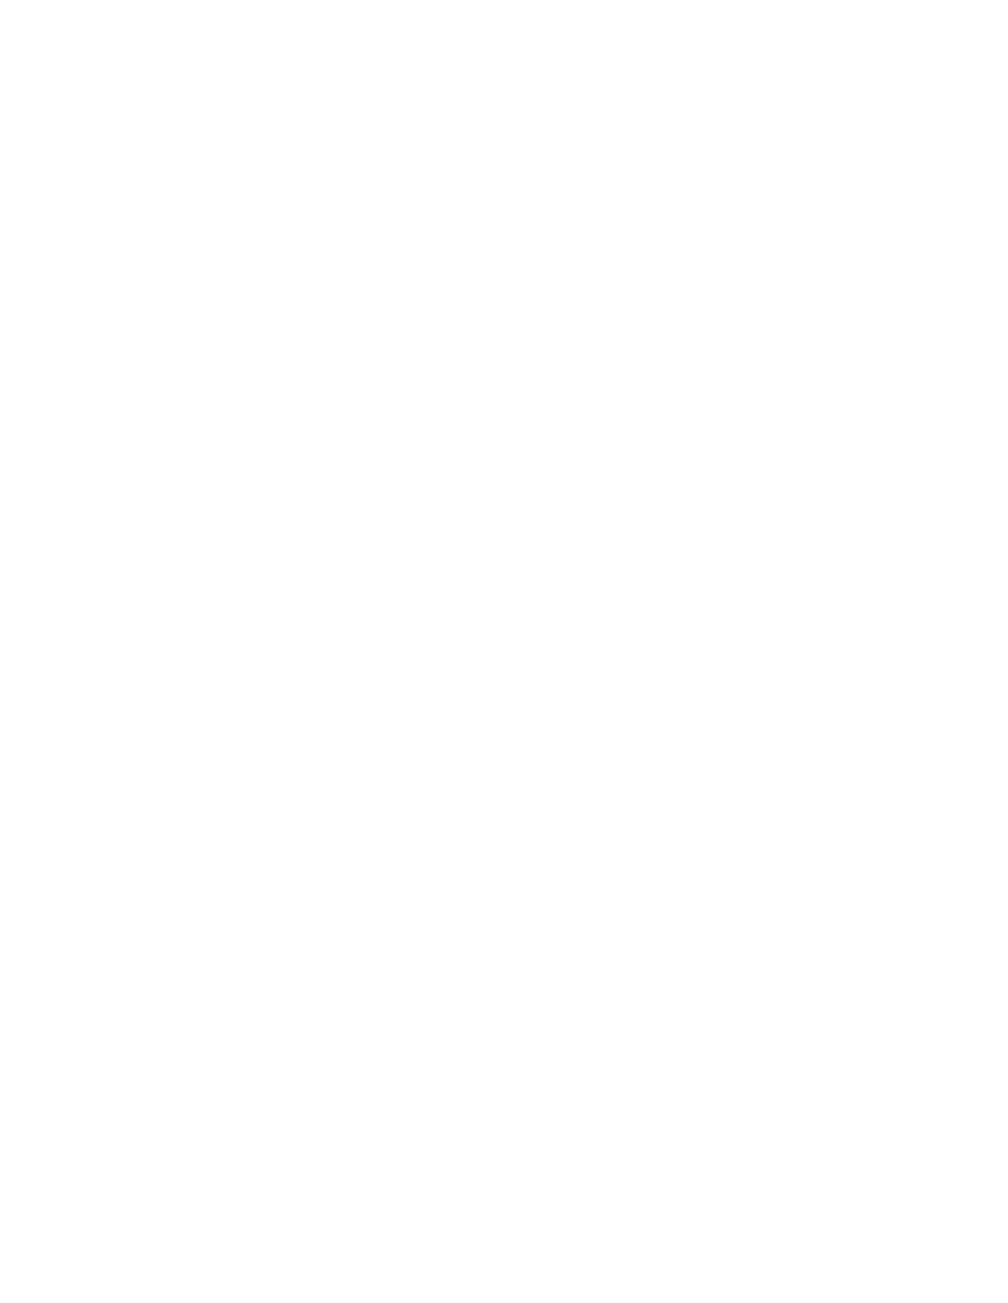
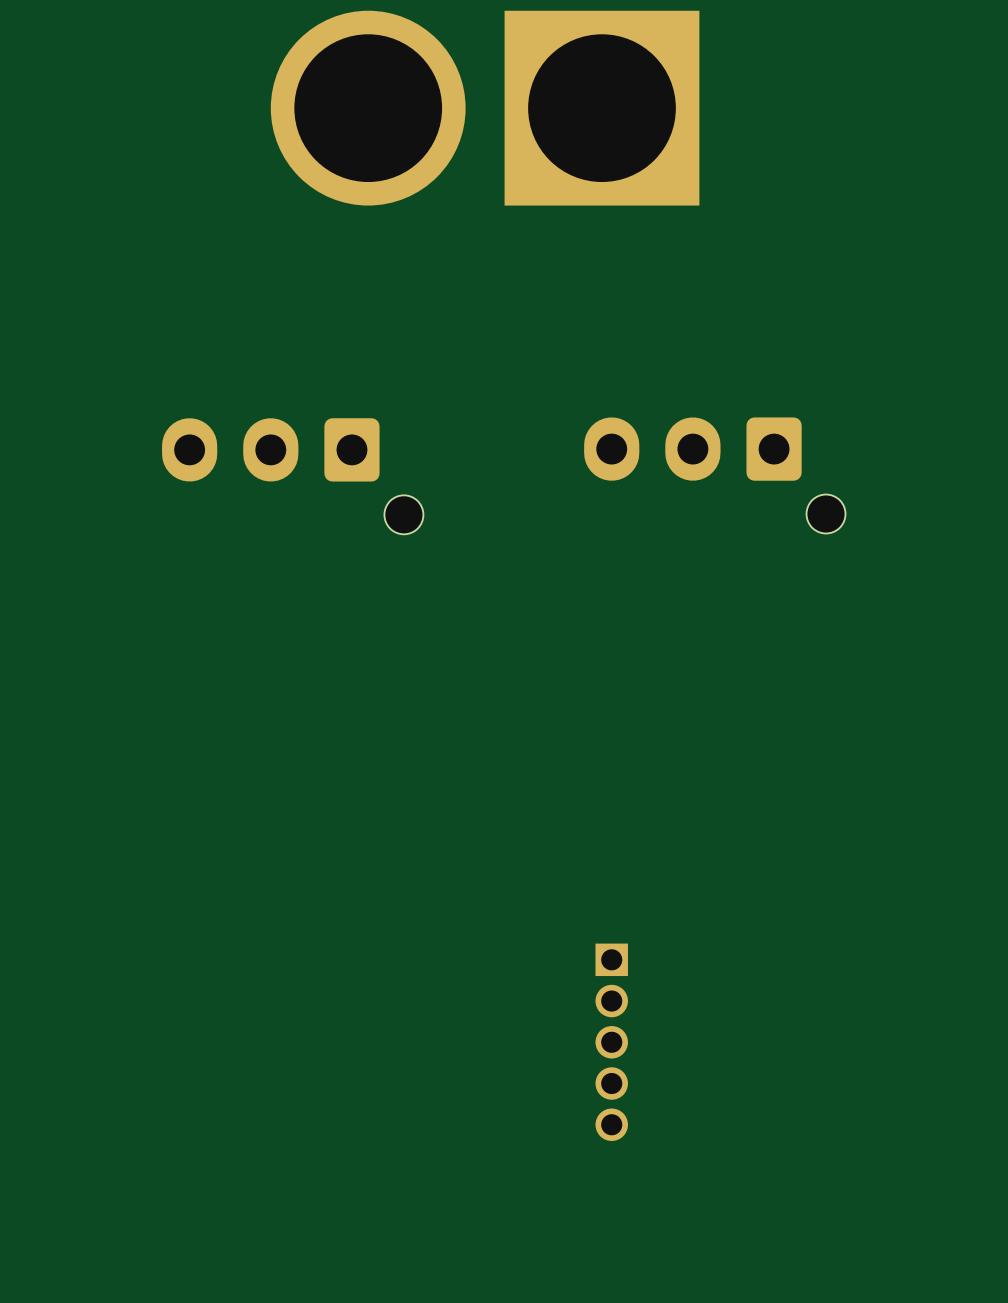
part: none -> (485, 108)
part: none -> (714, 475)
part: none -> (292, 476)
part: none -> (611, 1042)

